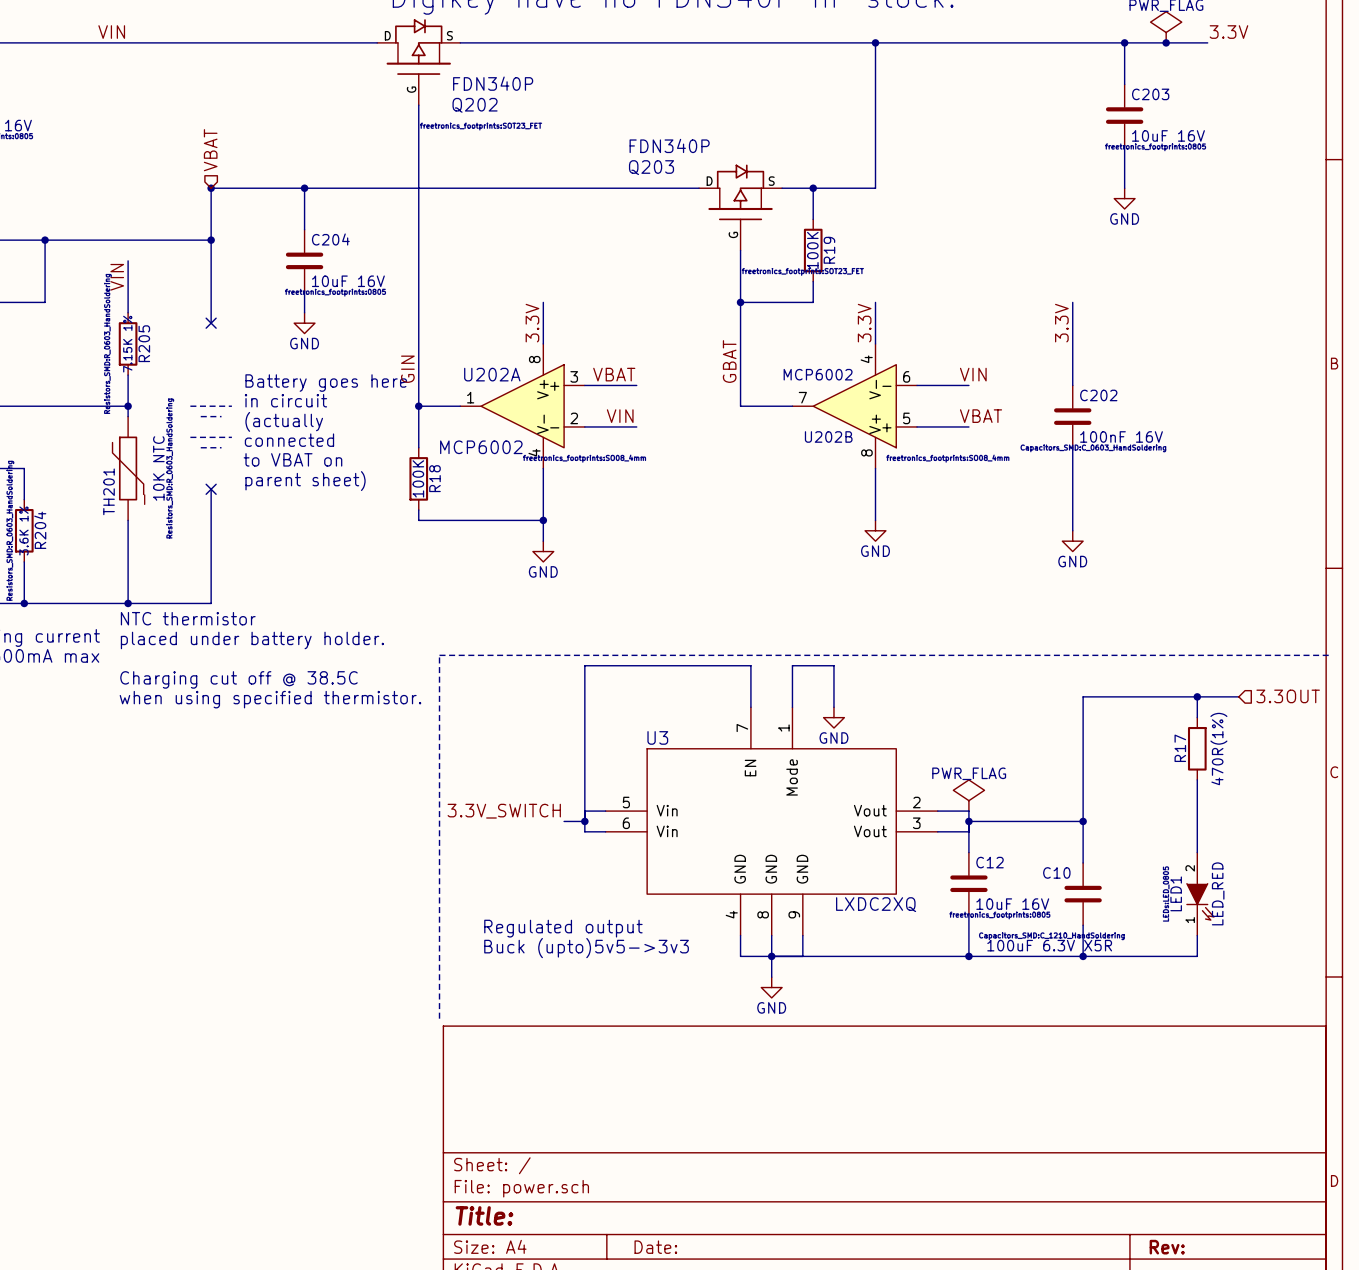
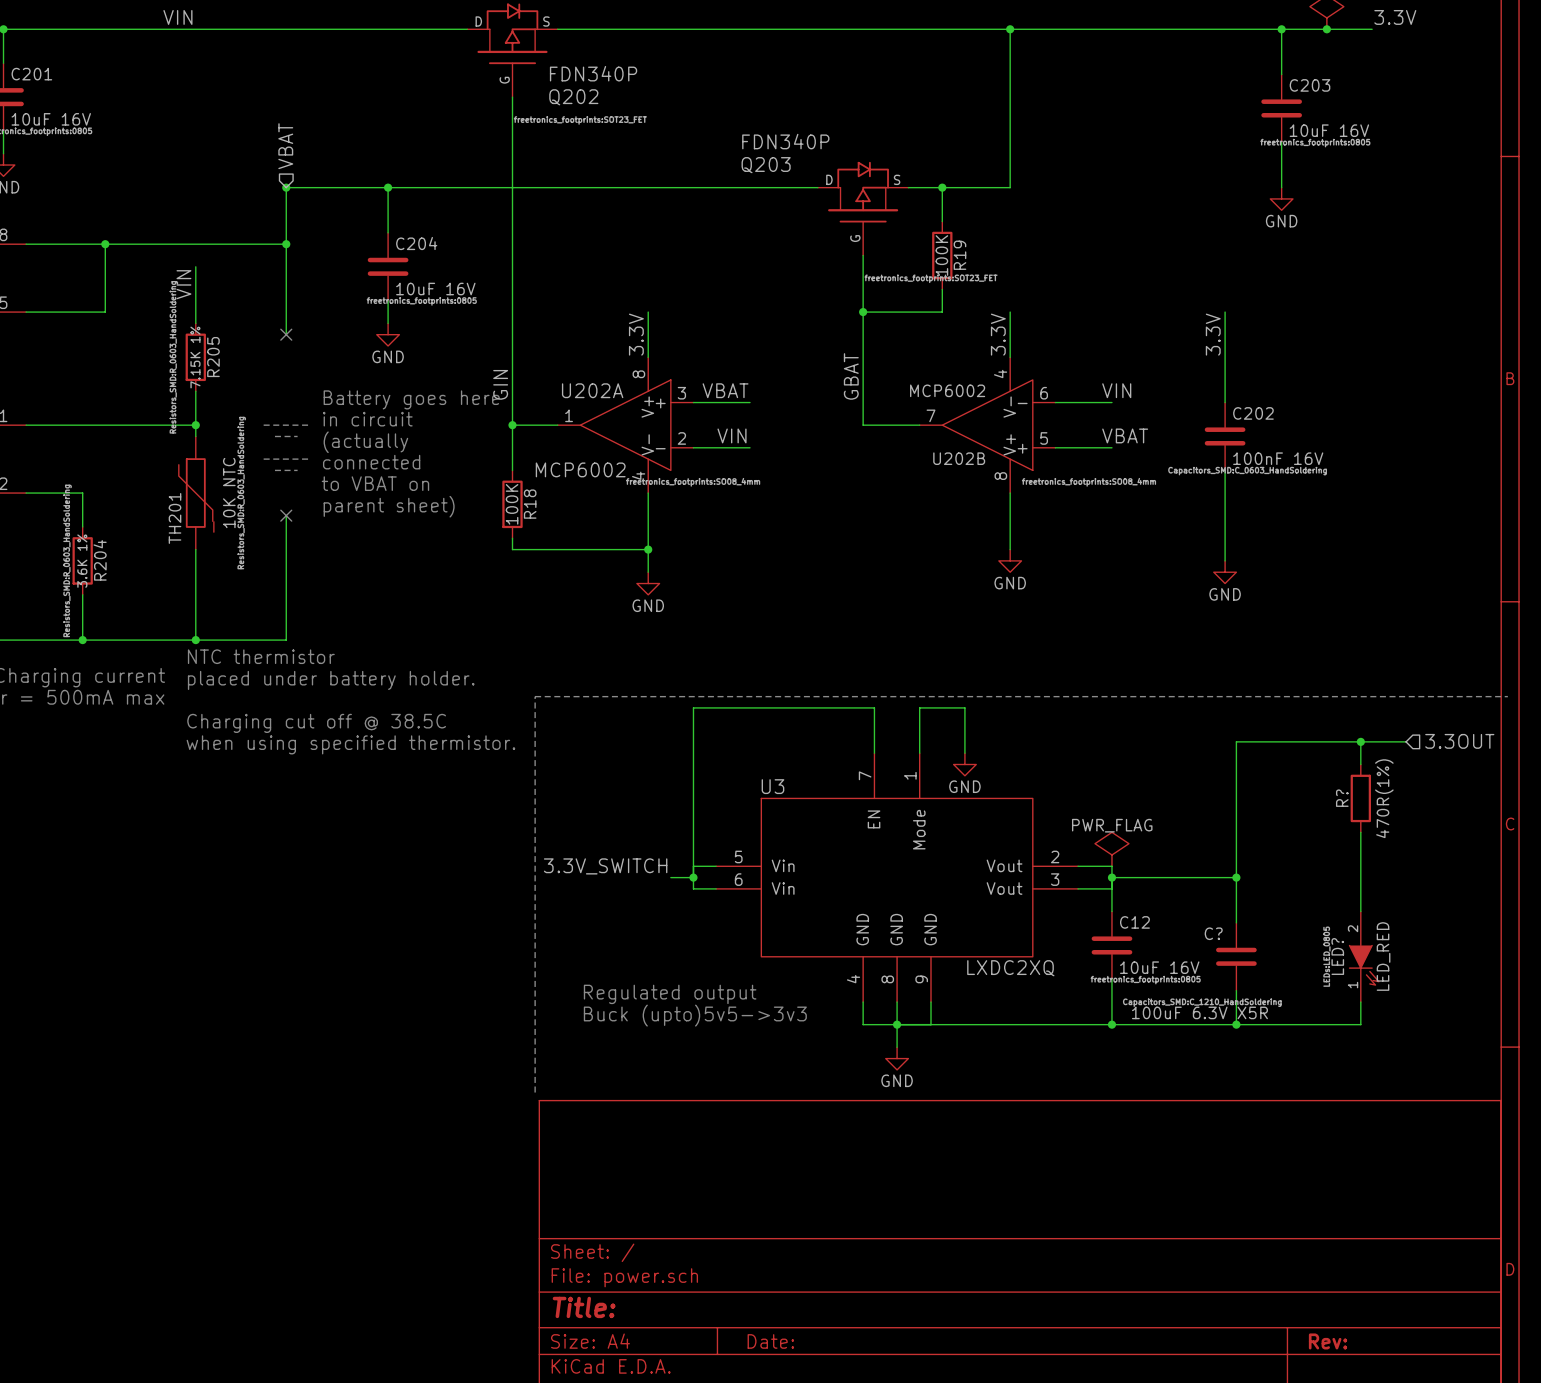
R17 name: R17 (1180, 748) -> R? (1342, 798)
C10 name: C10 (1056, 872) -> C? (1213, 933)
LED1 name: LED1 (1176, 893) -> LED? (1337, 956)

